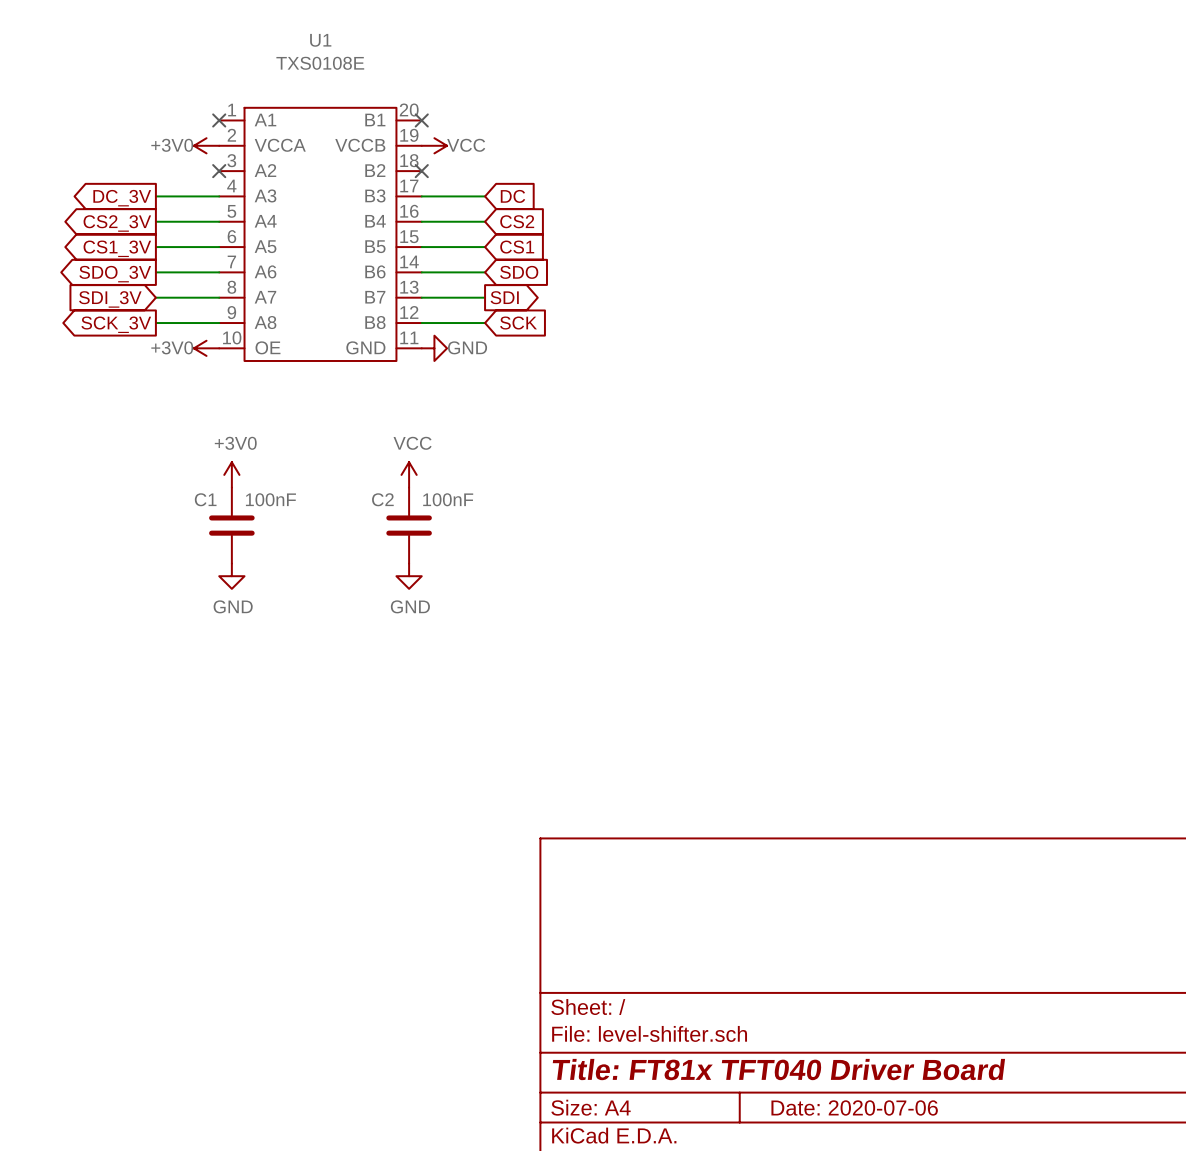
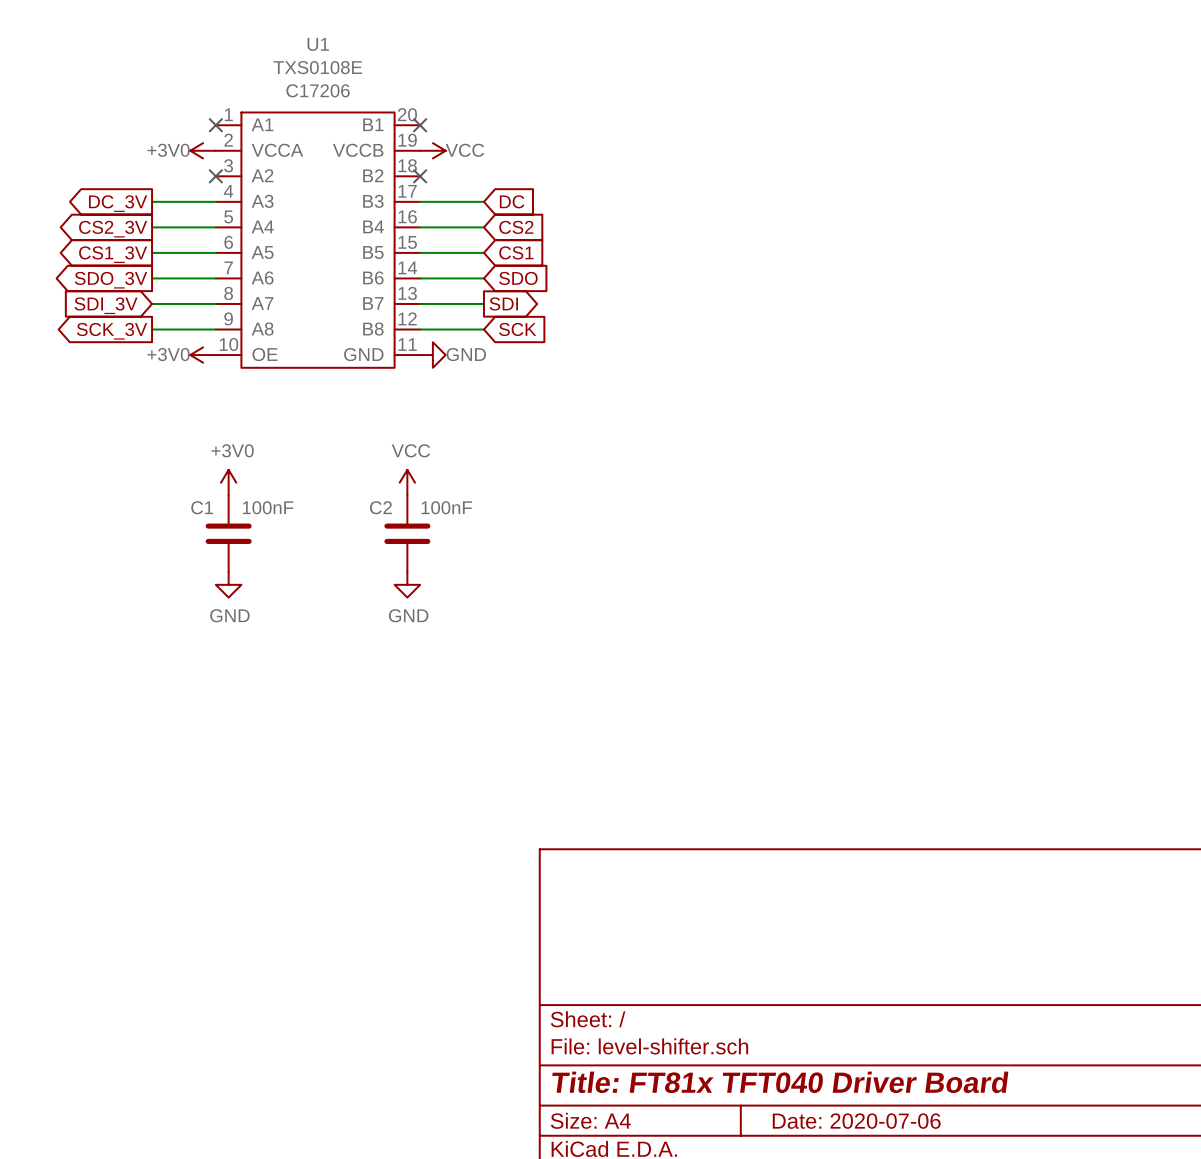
U1 text: none -> C17206 (318, 90)

